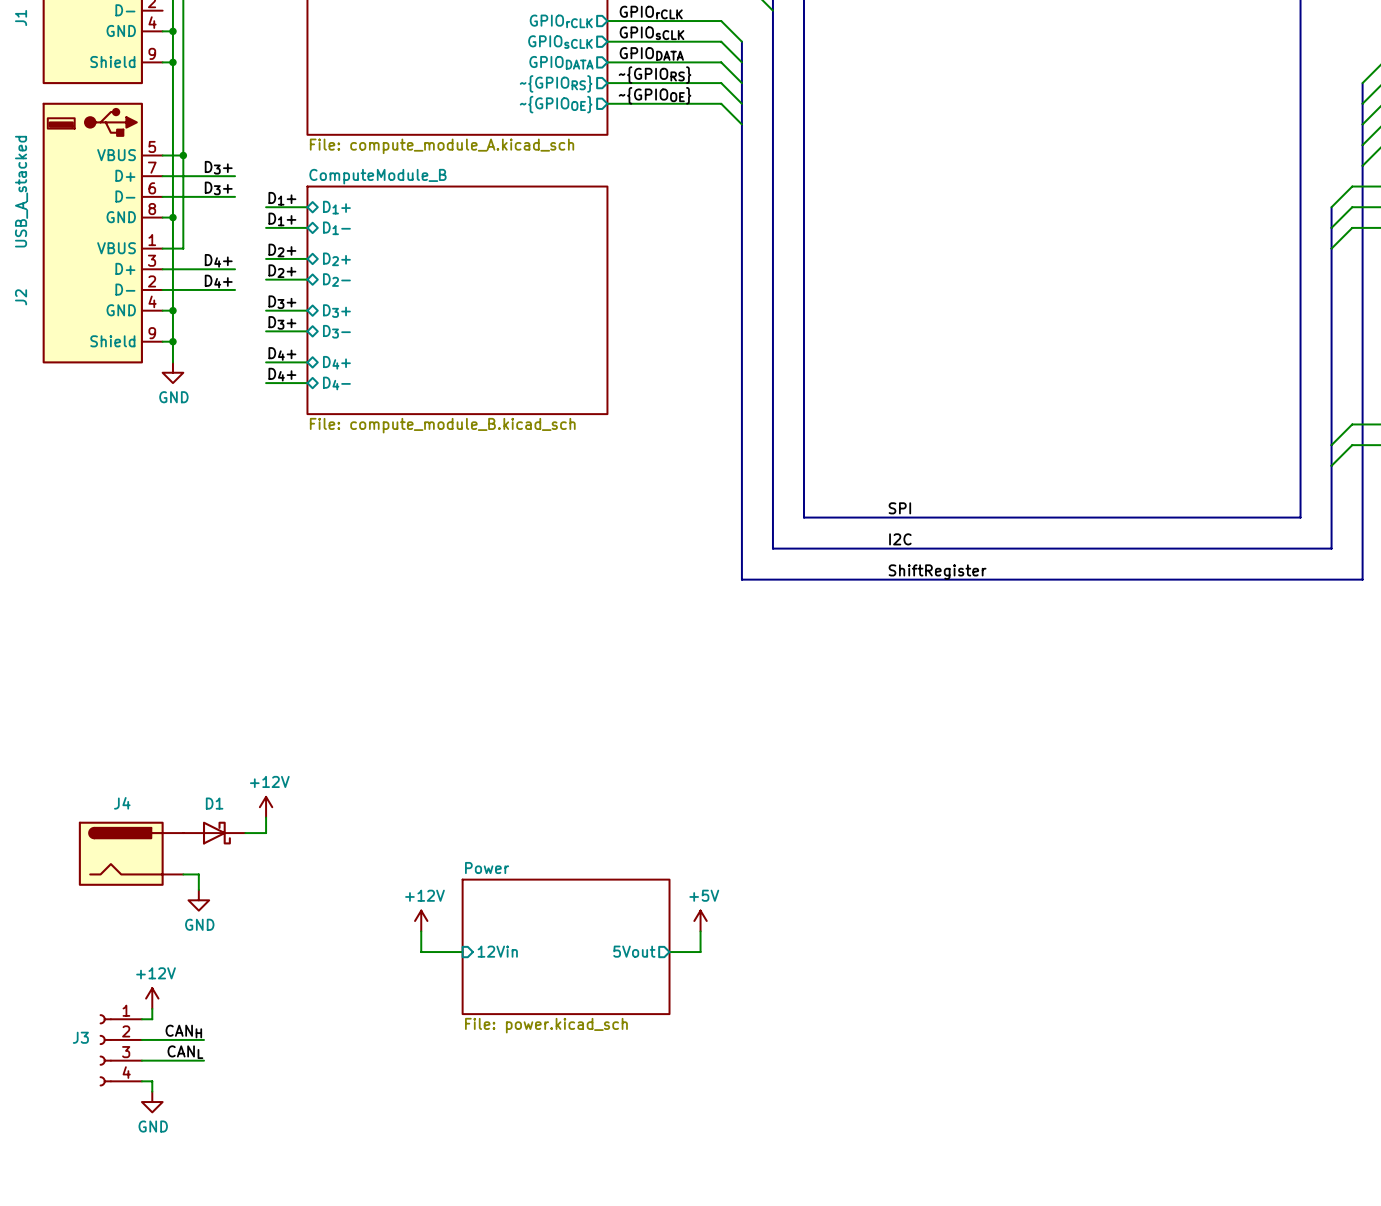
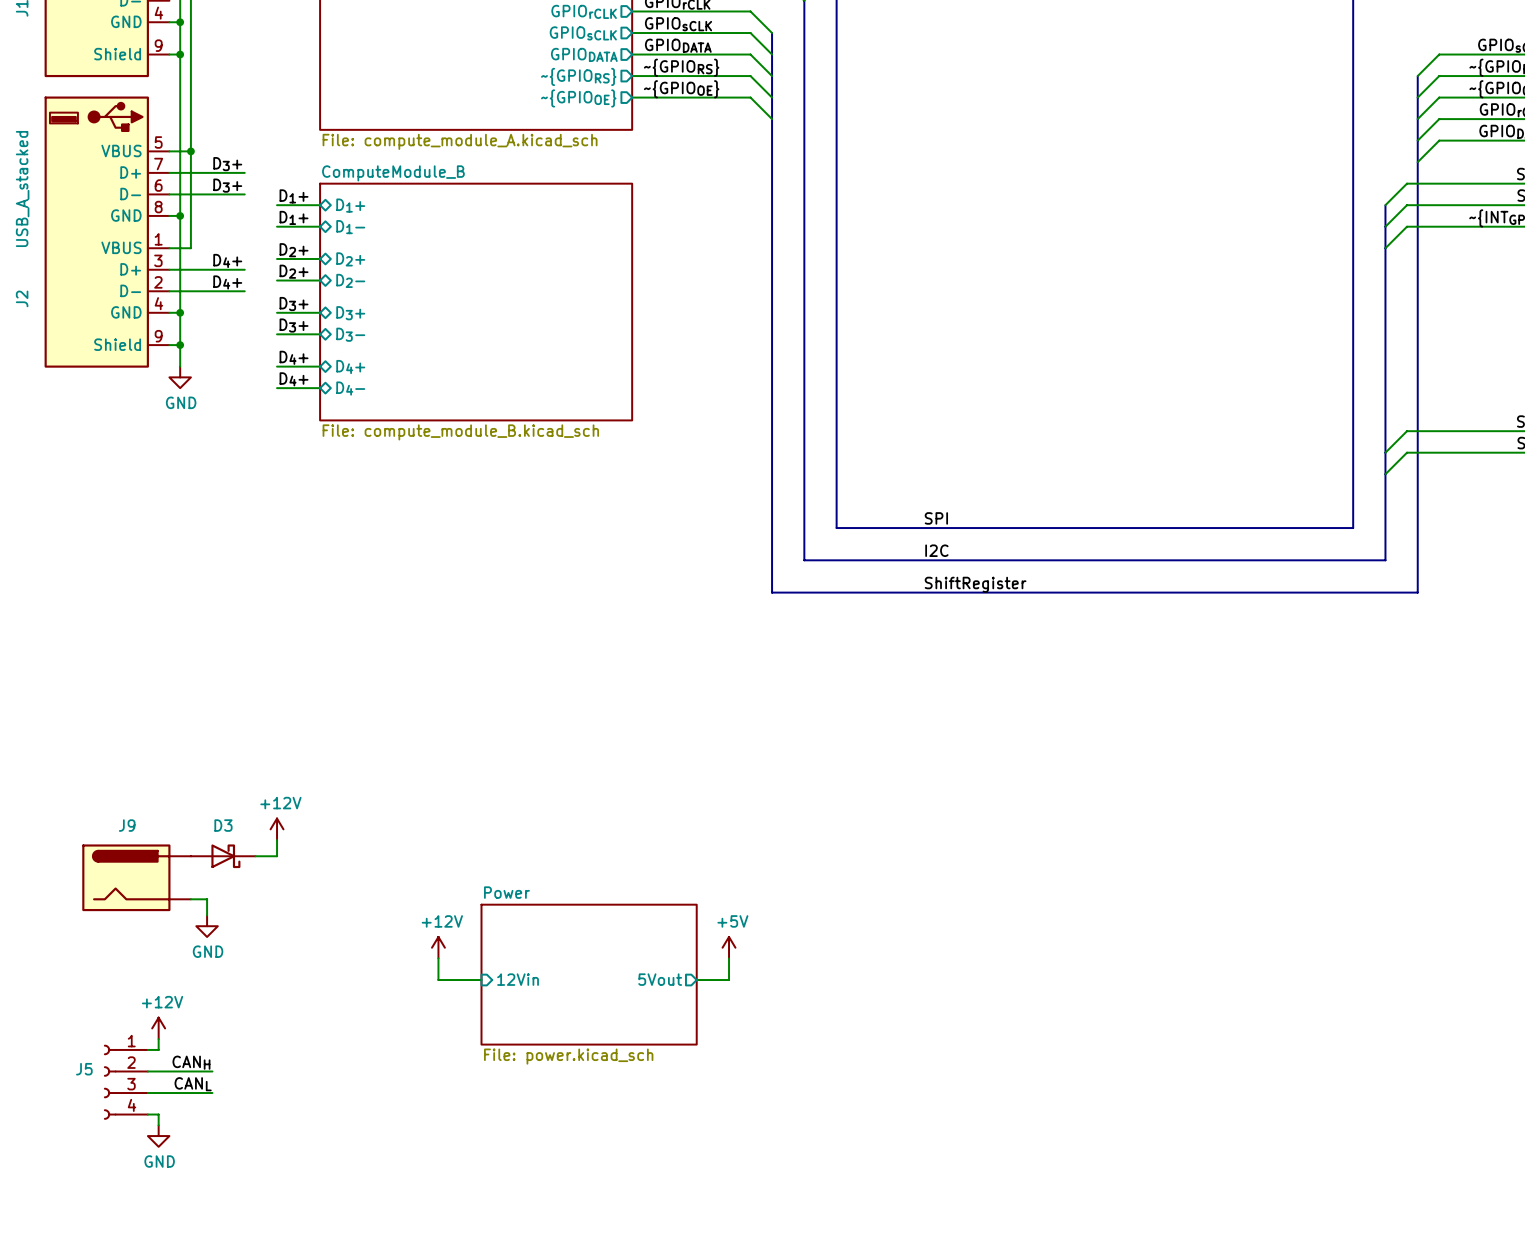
J4 name: J4 (122, 803) -> J9 (127, 825)
D1 name: D1 (214, 803) -> D3 (223, 825)
J3 name: J3 (80, 1037) -> J5 (84, 1069)

